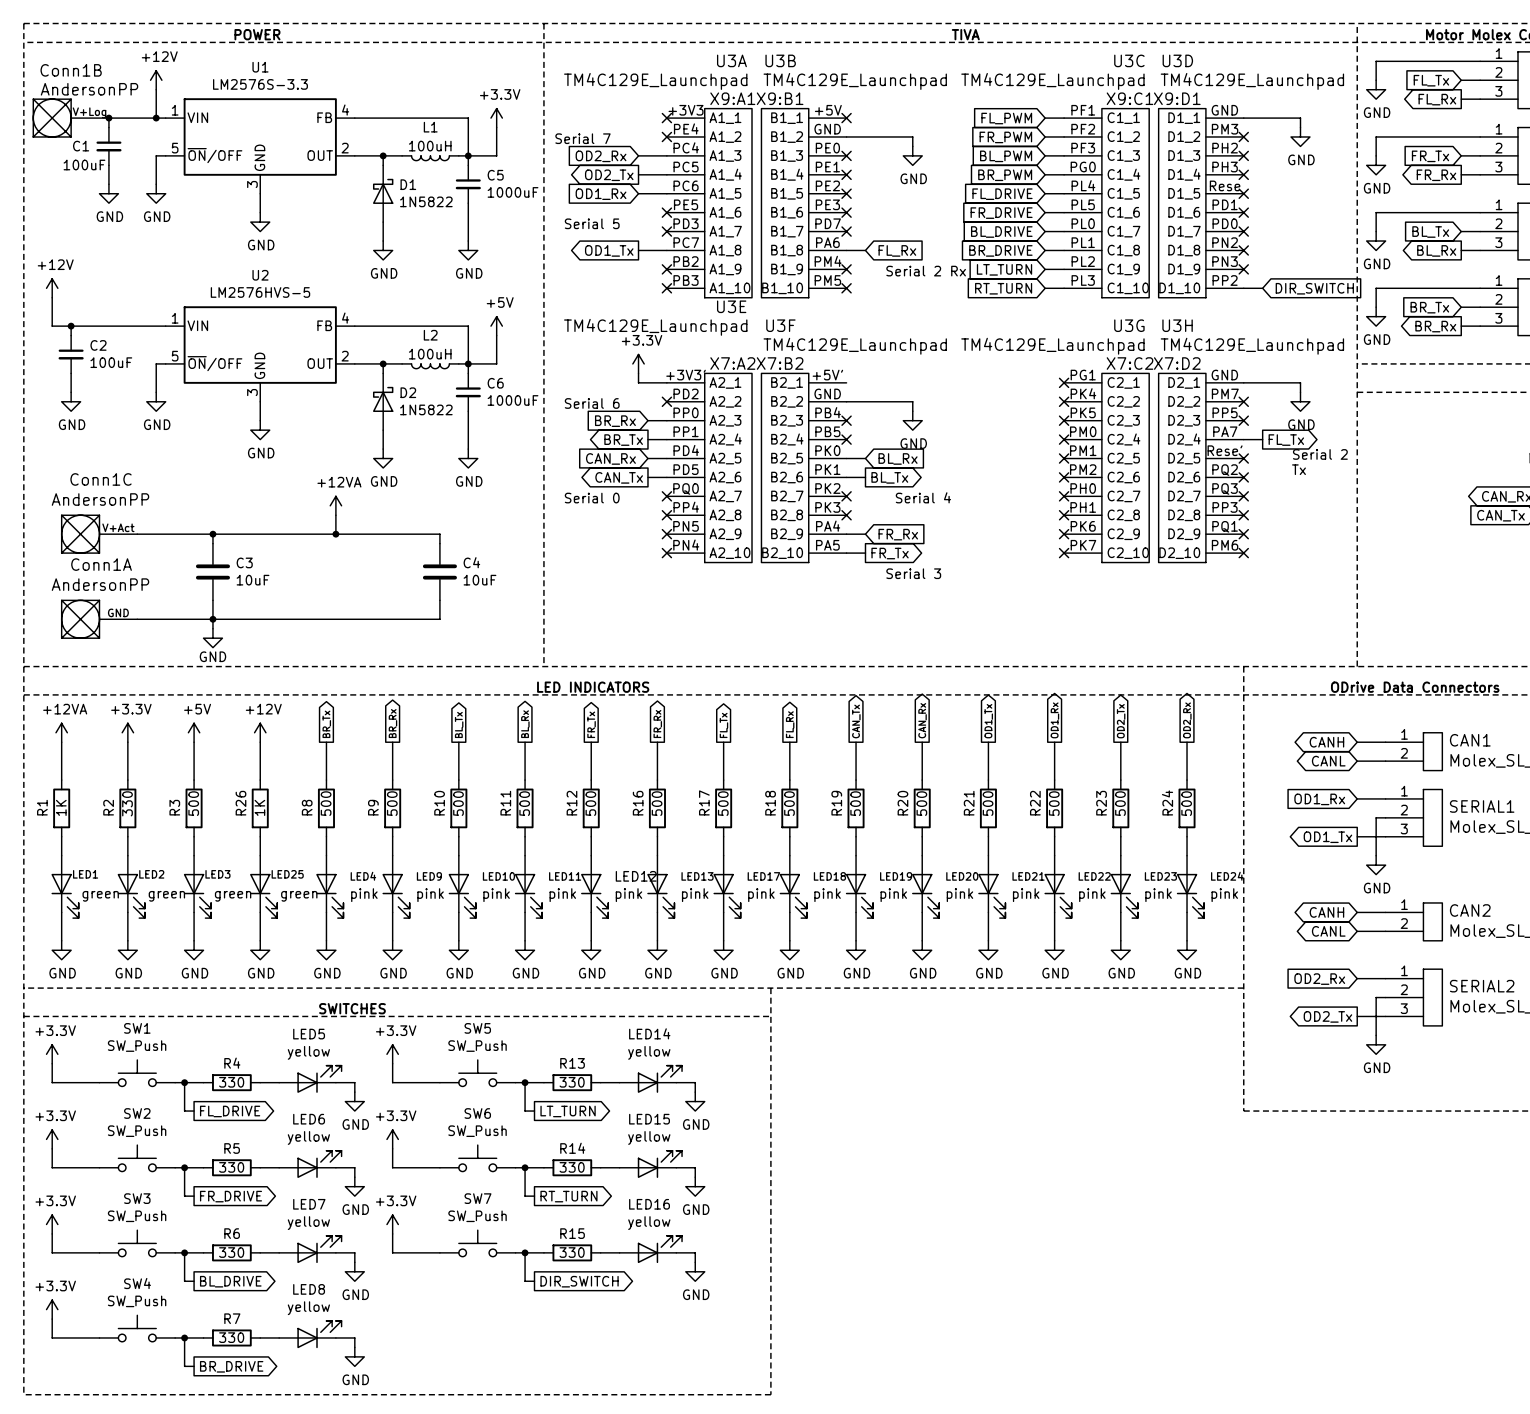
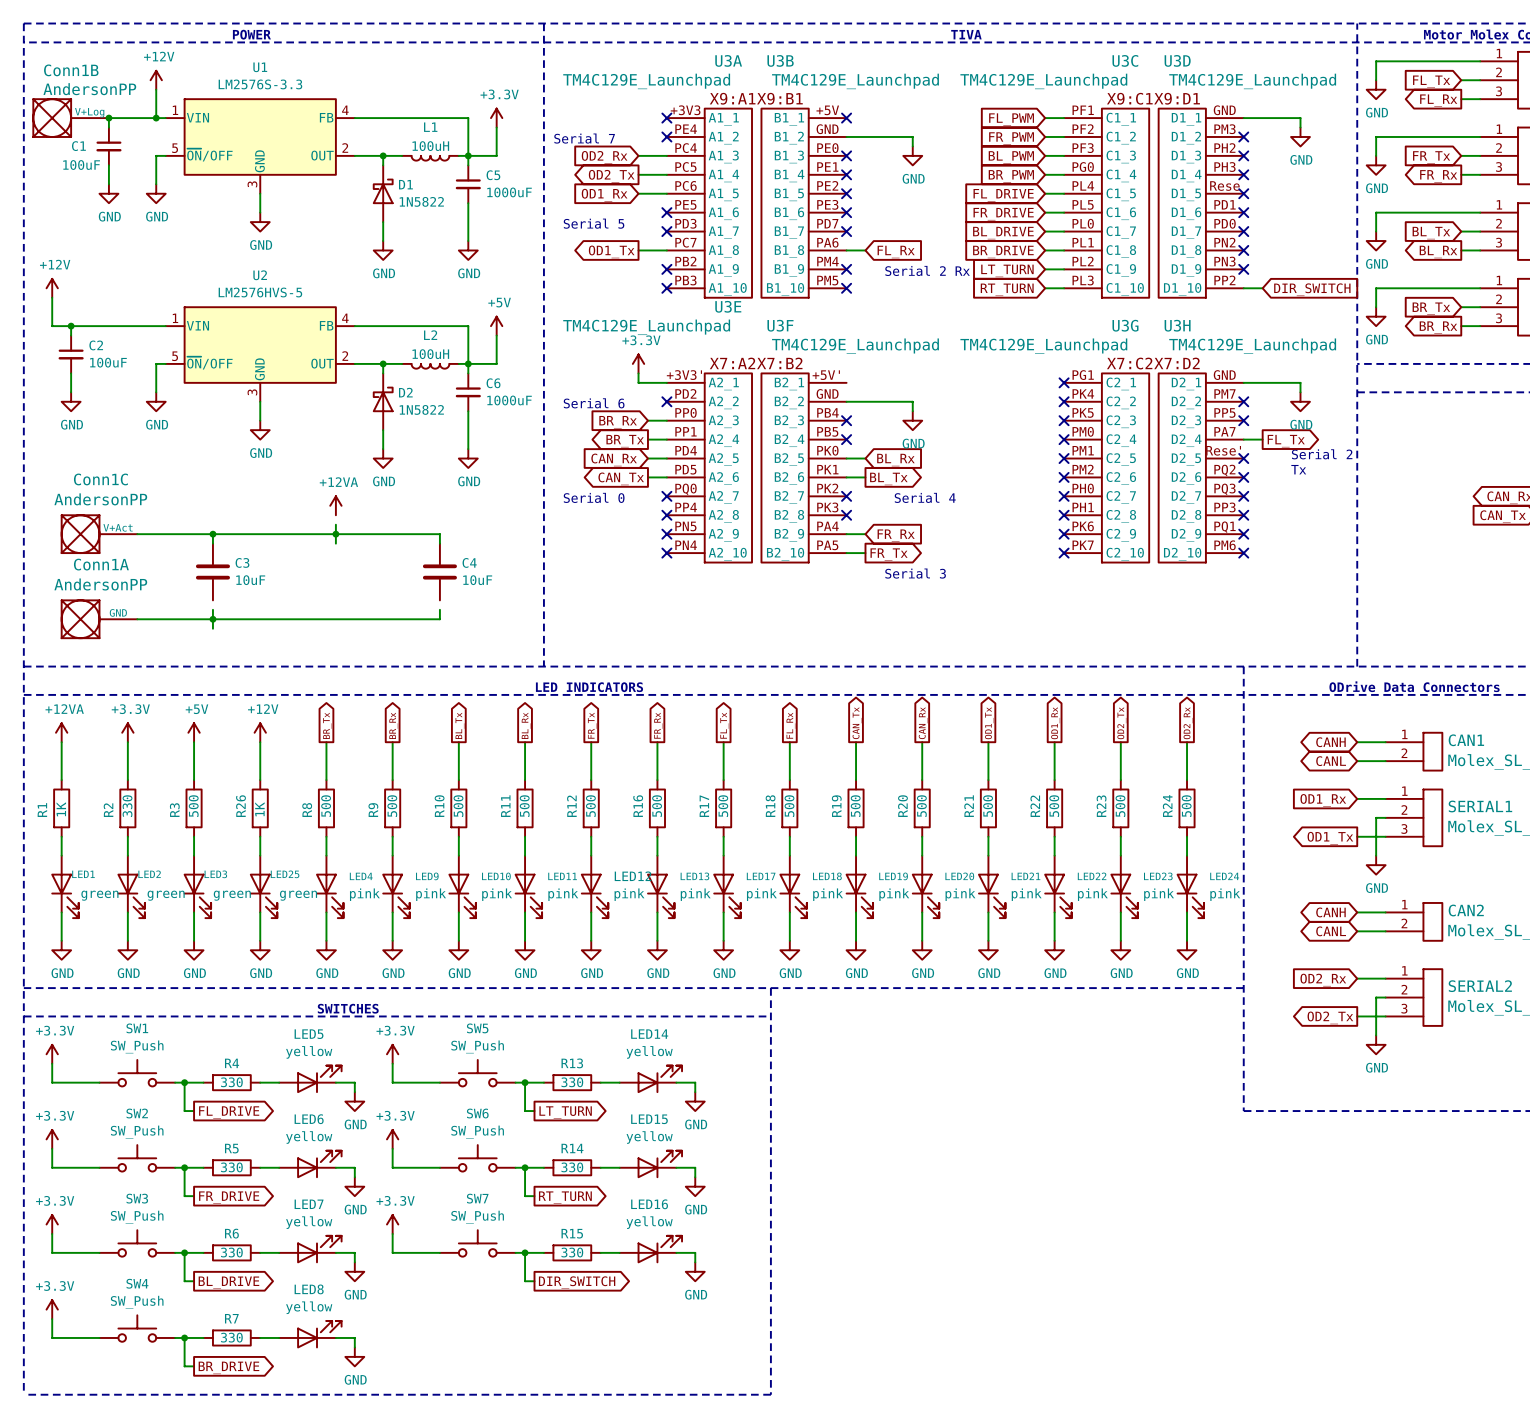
wire: (335, 515) (335, 524) -> (335, 534) (335, 543)
wire: (212, 600) (212, 609) -> none
wire: (439, 600) (439, 609) -> none
power symbol: GND (212, 638) -> none

